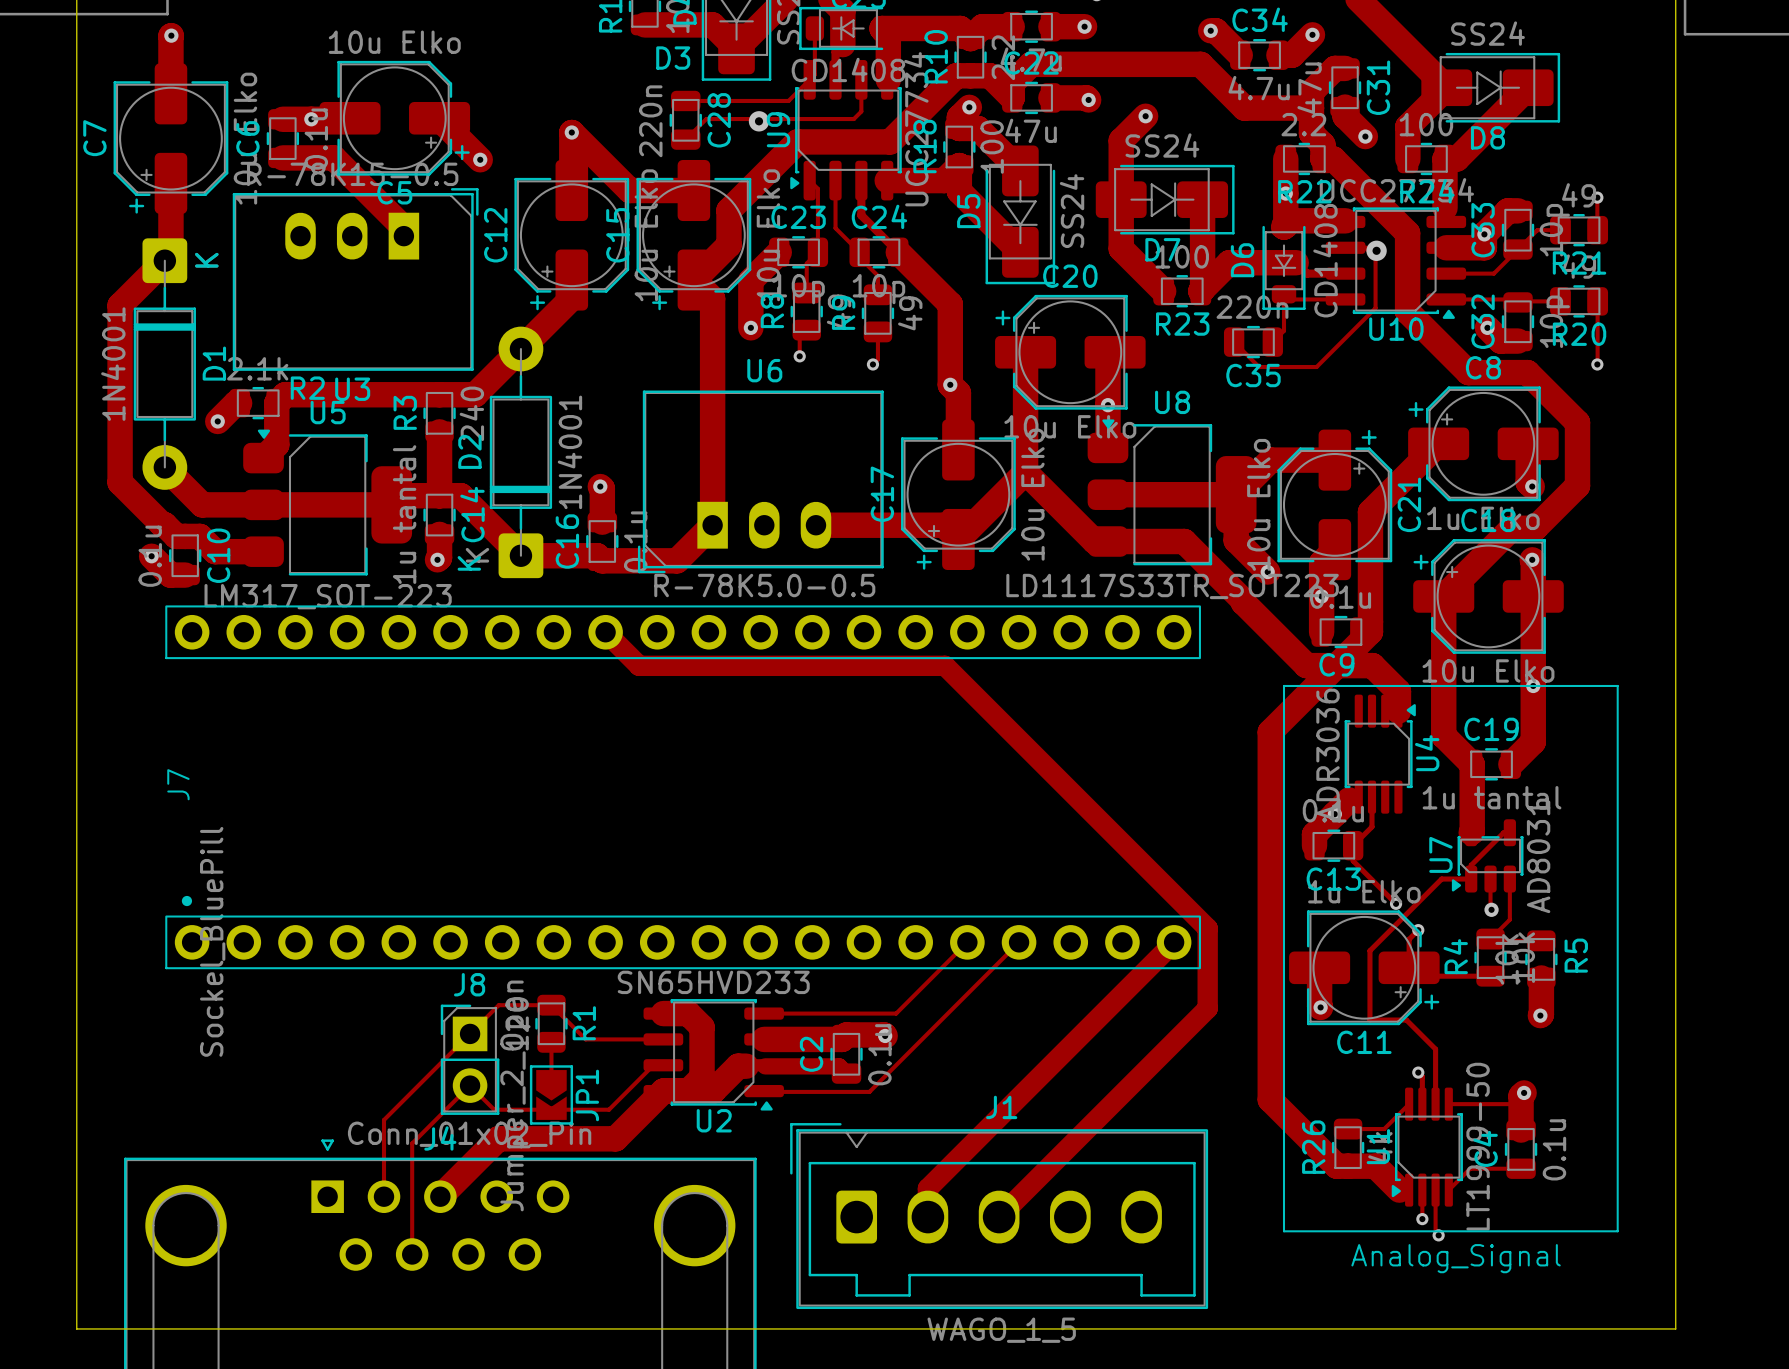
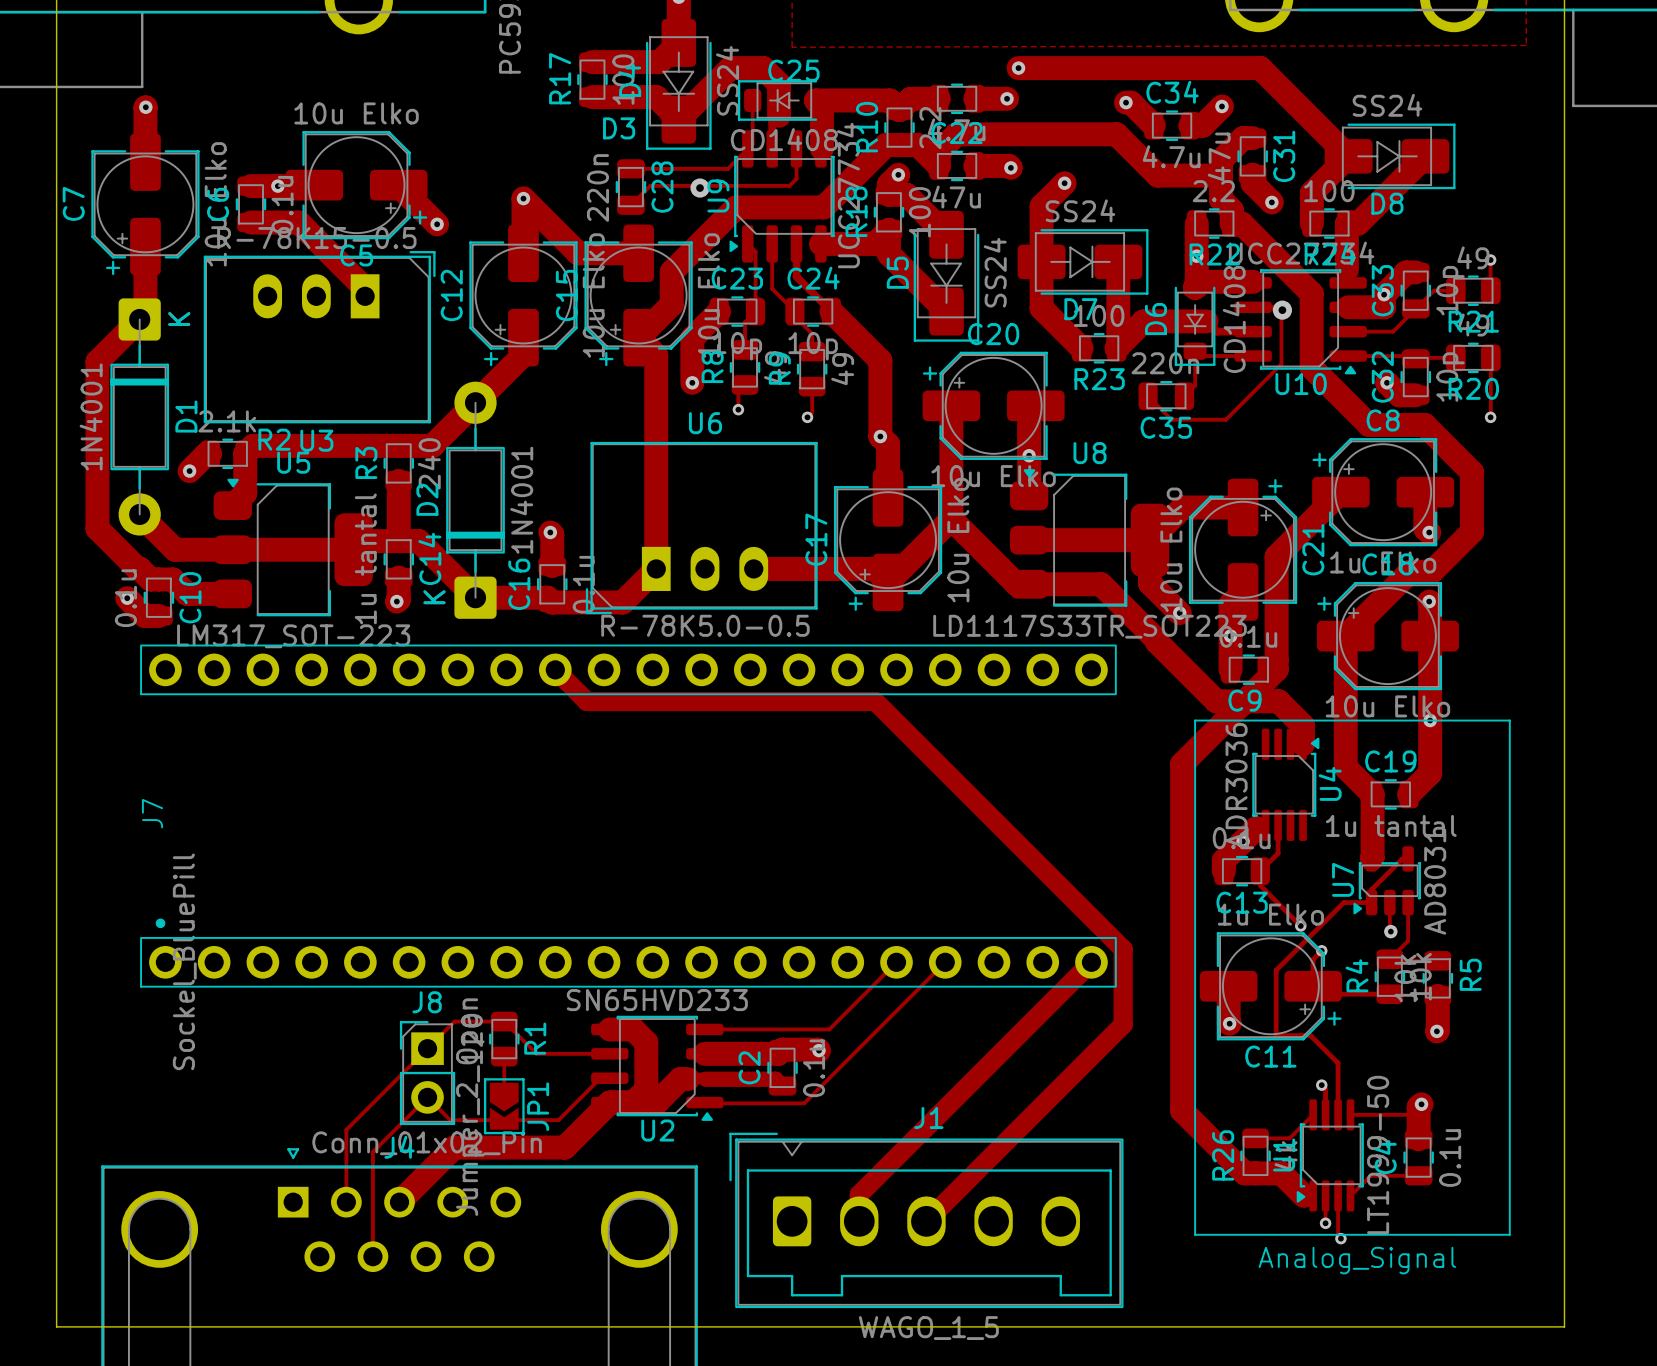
D2 footprint: [489, 326, 553, 579] -> [446, 381, 505, 619]

